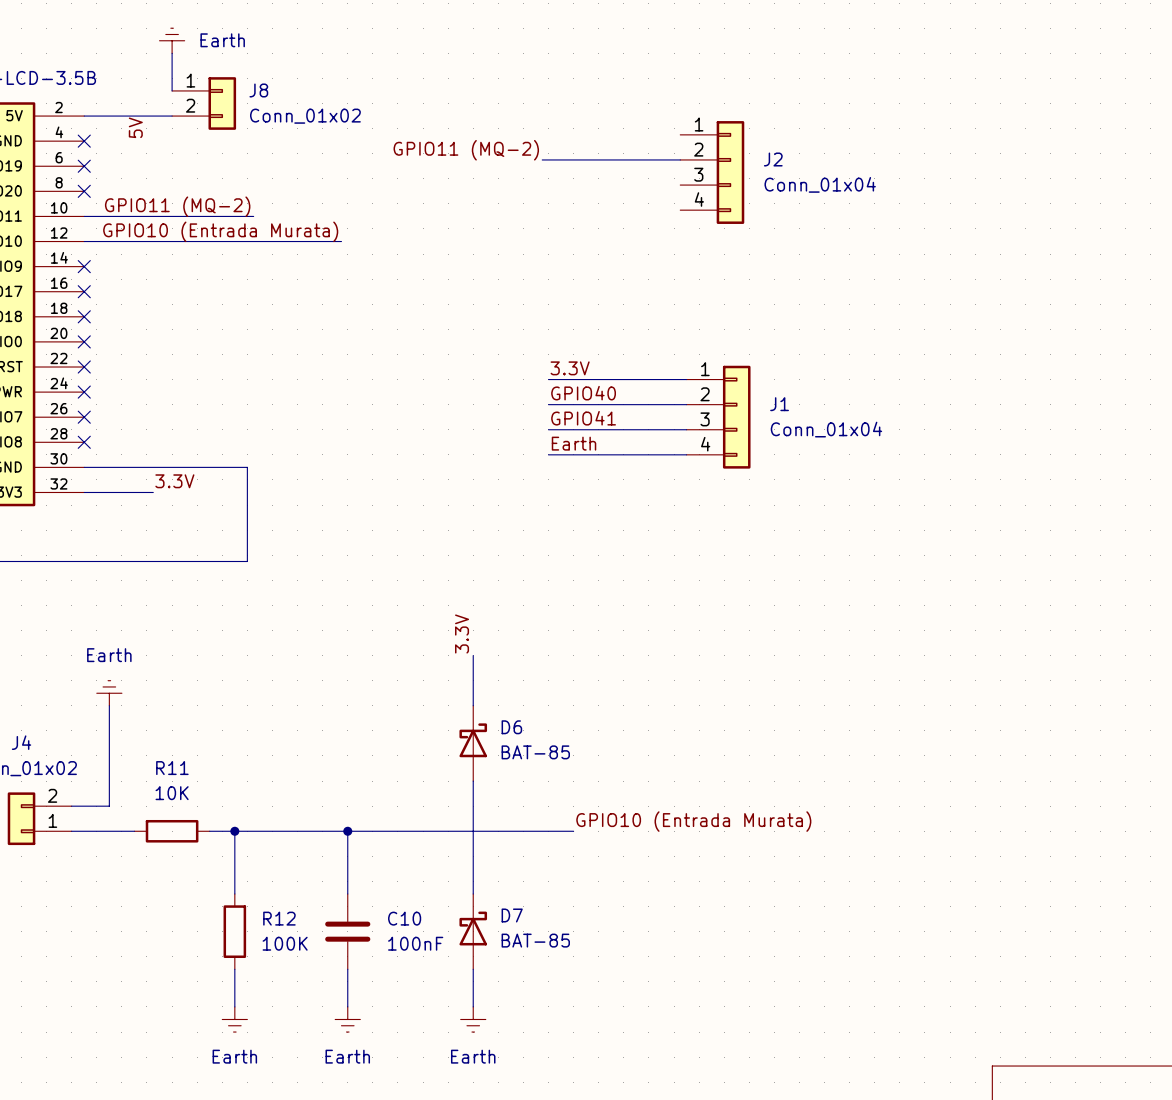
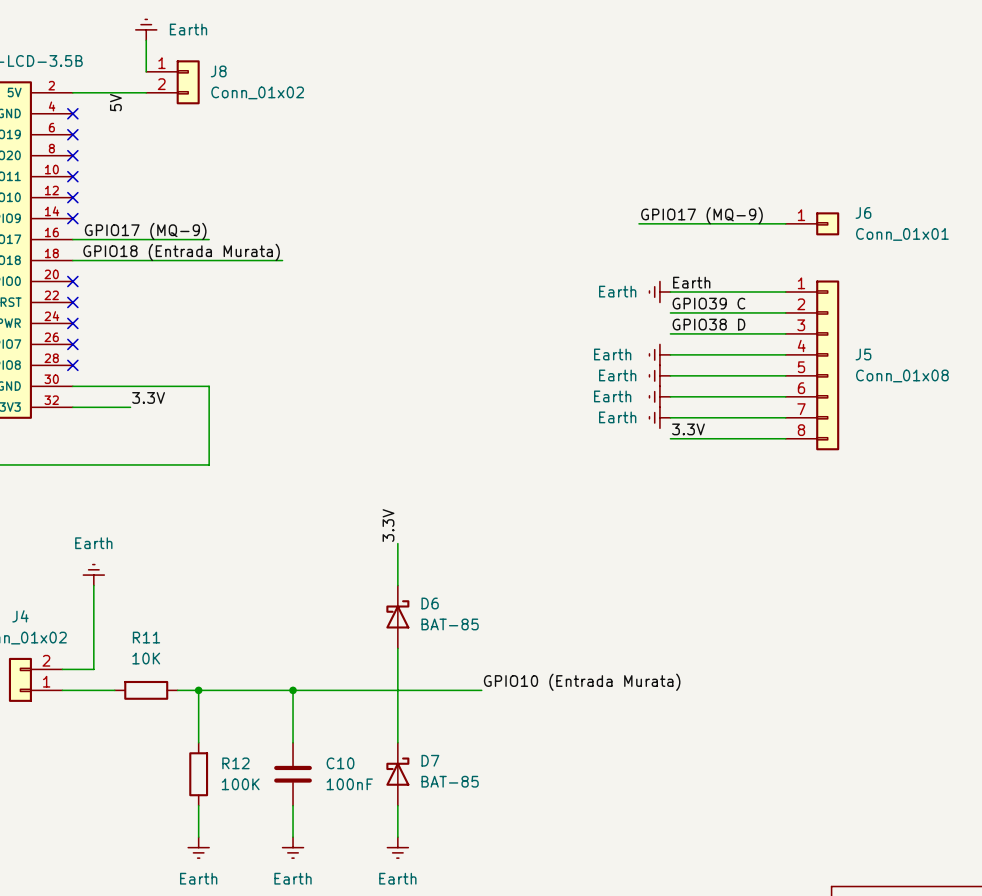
label: GPIO11 (MQ-2) (466, 150) -> none
wire: (542, 159) (680, 159) -> none
J2: Conn_01x04 (712, 172) -> none
label: GPIO11 (MQ-2) (177, 206) -> none
wire: (84, 216) (253, 216) -> none
no-connect mark: none -> (72, 176)
label: GPIO10 (Entrada Murata) (220, 231) -> none
wire: (84, 241) (341, 241) -> none
no-connect mark: none -> (72, 197)
label: none -> GPIO17 (MQ-9) (701, 215)
wire: none -> (638, 223) (785, 223)
J6: none -> Conn_01x01 (812, 223)
label: none -> GPIO17 (MQ-9) (145, 231)
wire: none -> (72, 239) (209, 239)
no-connect mark: (84, 291) -> none
label: none -> GPIO18 (Entrada Murata) (181, 252)
wire: none -> (72, 260) (282, 260)
no-connect mark: (84, 316) -> none
label: none -> Earth (691, 282)
power symbol: none -> Earth (659, 291)
wire: none -> (670, 291) (785, 291)
label: 3.3V (570, 368) -> none
label: none -> GPIO39 C (708, 303)
wire: (548, 379) (686, 379) -> none
wire: none -> (670, 312) (785, 312)
label: GPIO40 (583, 393) -> none
label: none -> GPIO38 D (708, 324)
wire: (548, 404) (686, 404) -> none
wire: none -> (670, 333) (785, 333)
J1: Conn_01x04 (718, 417) -> none
label: GPIO41 (583, 418) -> none
wire: (548, 429) (686, 429) -> none
power symbol: none -> Earth (659, 354)
wire: none -> (670, 354) (785, 354)
J5: none -> Conn_01x08 (812, 365)
label: Earth (574, 443) -> none
wire: (548, 454) (686, 454) -> none
power symbol: none -> Earth (659, 375)
wire: none -> (670, 375) (785, 375)
power symbol: none -> Earth (659, 396)
wire: none -> (670, 396) (785, 396)
power symbol: none -> Earth (659, 417)
wire: none -> (670, 417) (785, 417)
label: none -> 3.3V (688, 429)
wire: none -> (670, 438) (785, 438)

